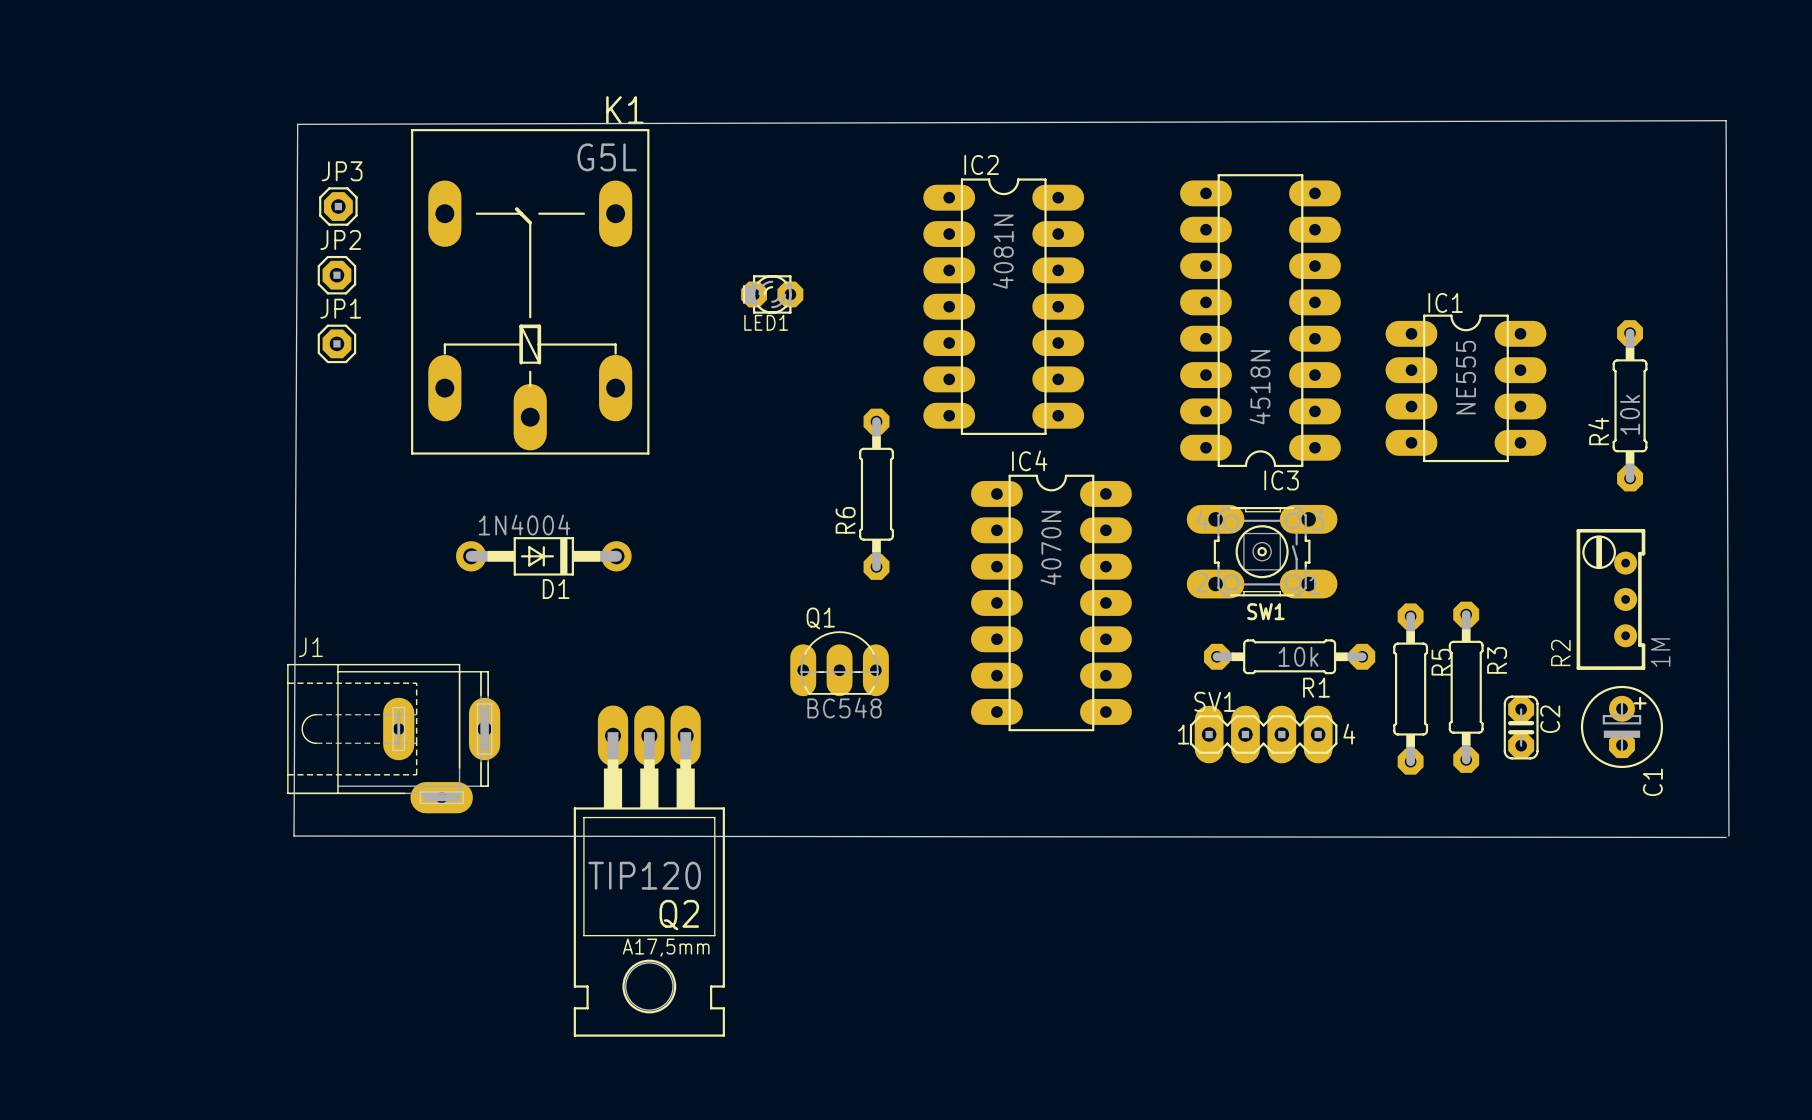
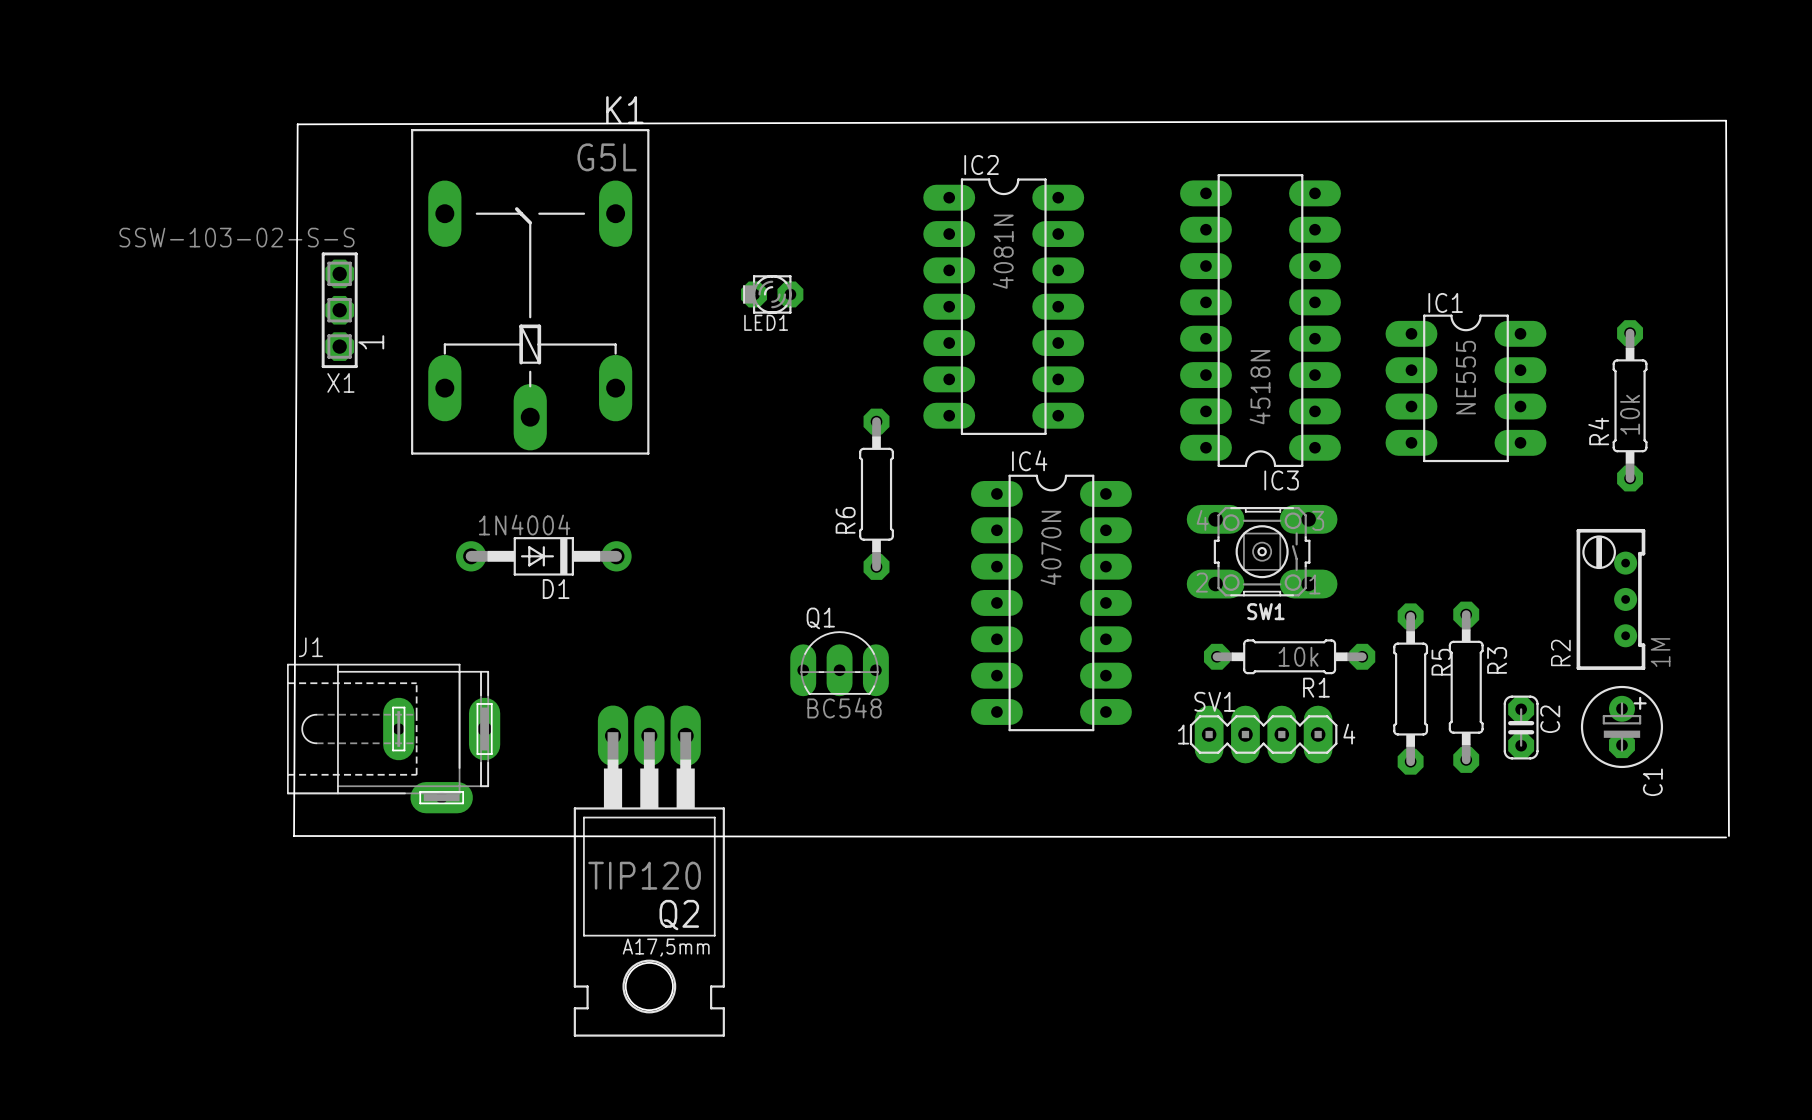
JP3: (338, 206) -> none
JP2: (336, 275) -> none
X1: none -> SSW-103-02-S-S (339, 310)
JP1: (336, 343) -> none

